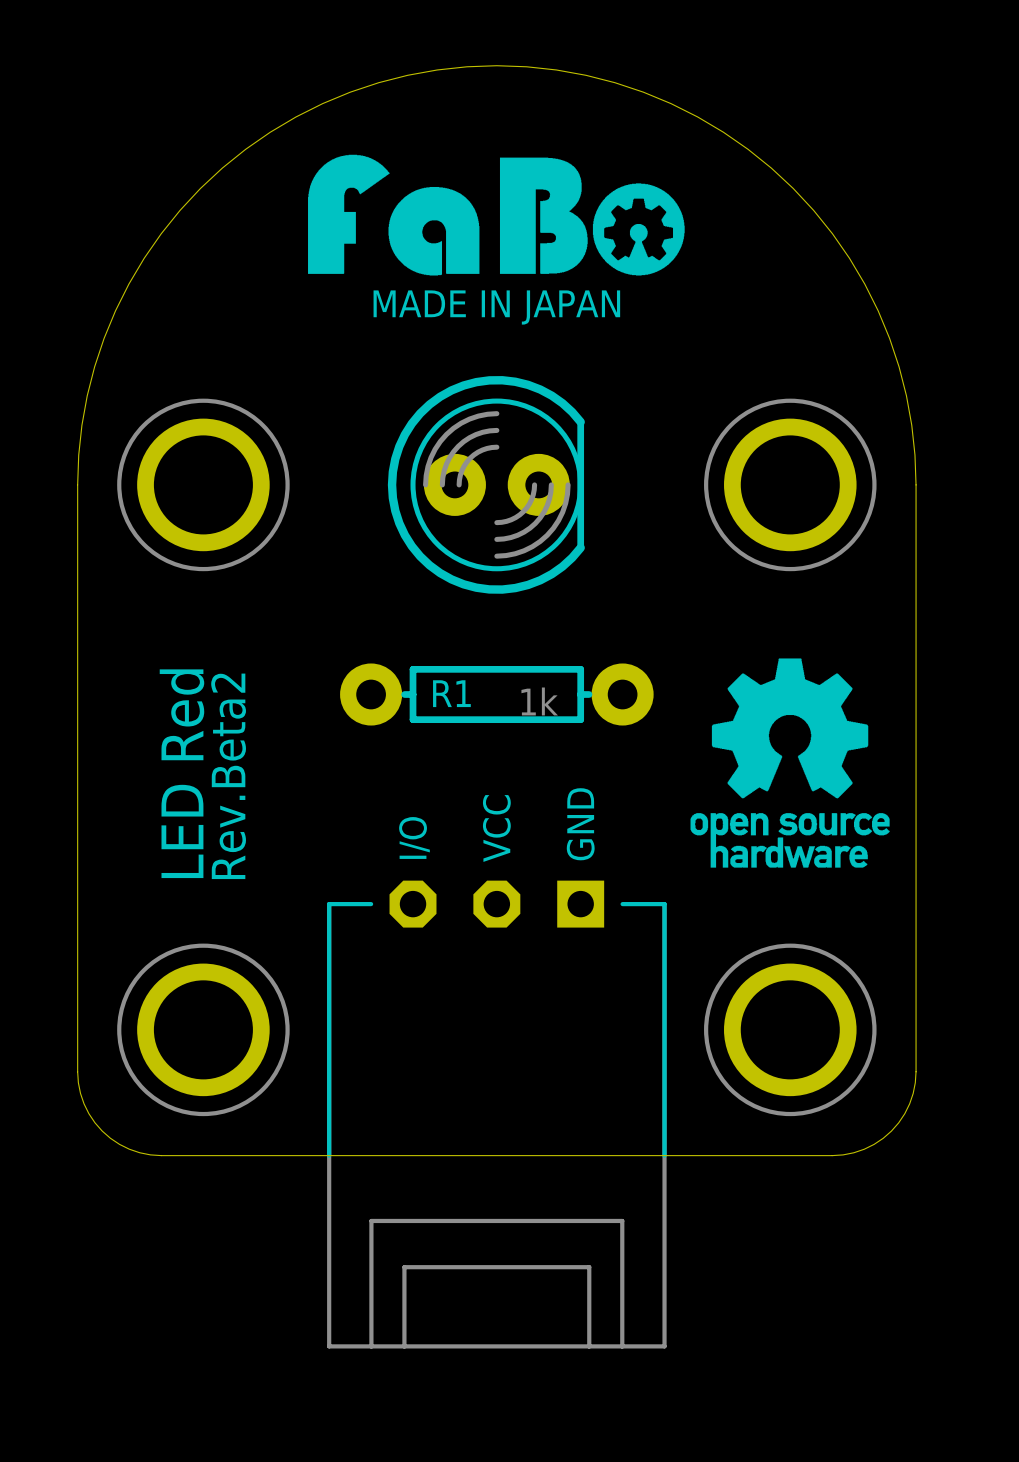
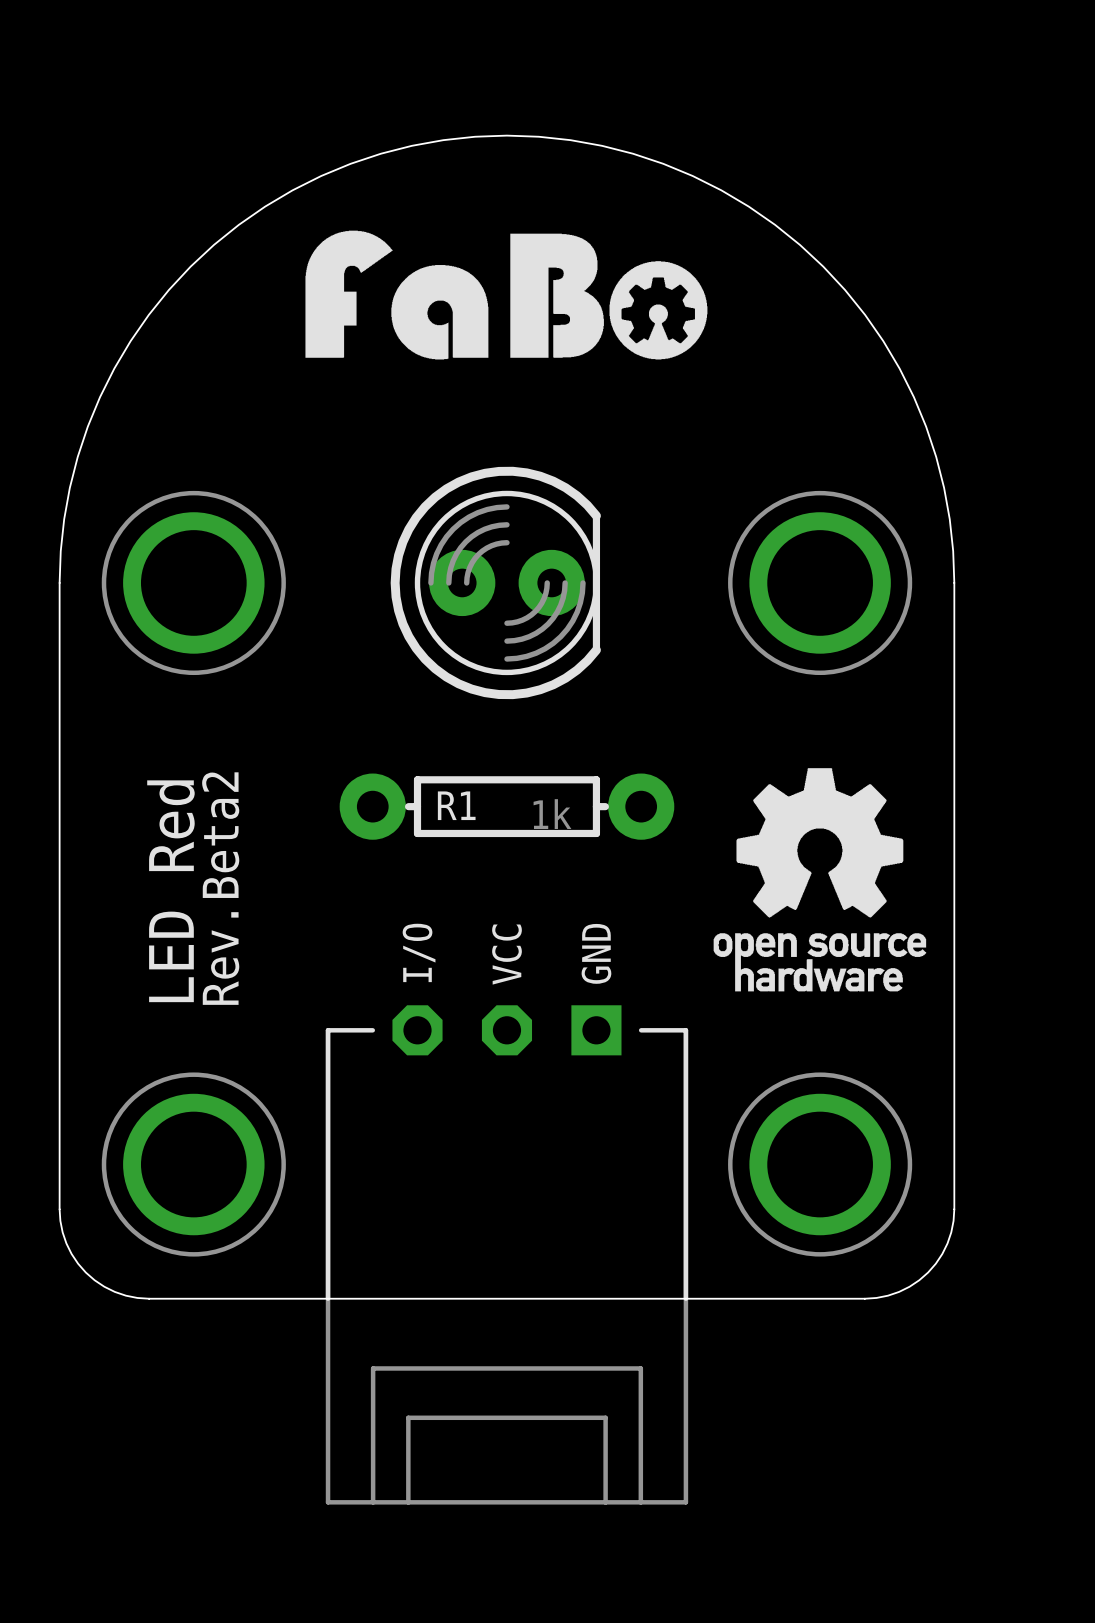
text: MADE IN JAPAN (496, 307) -> none

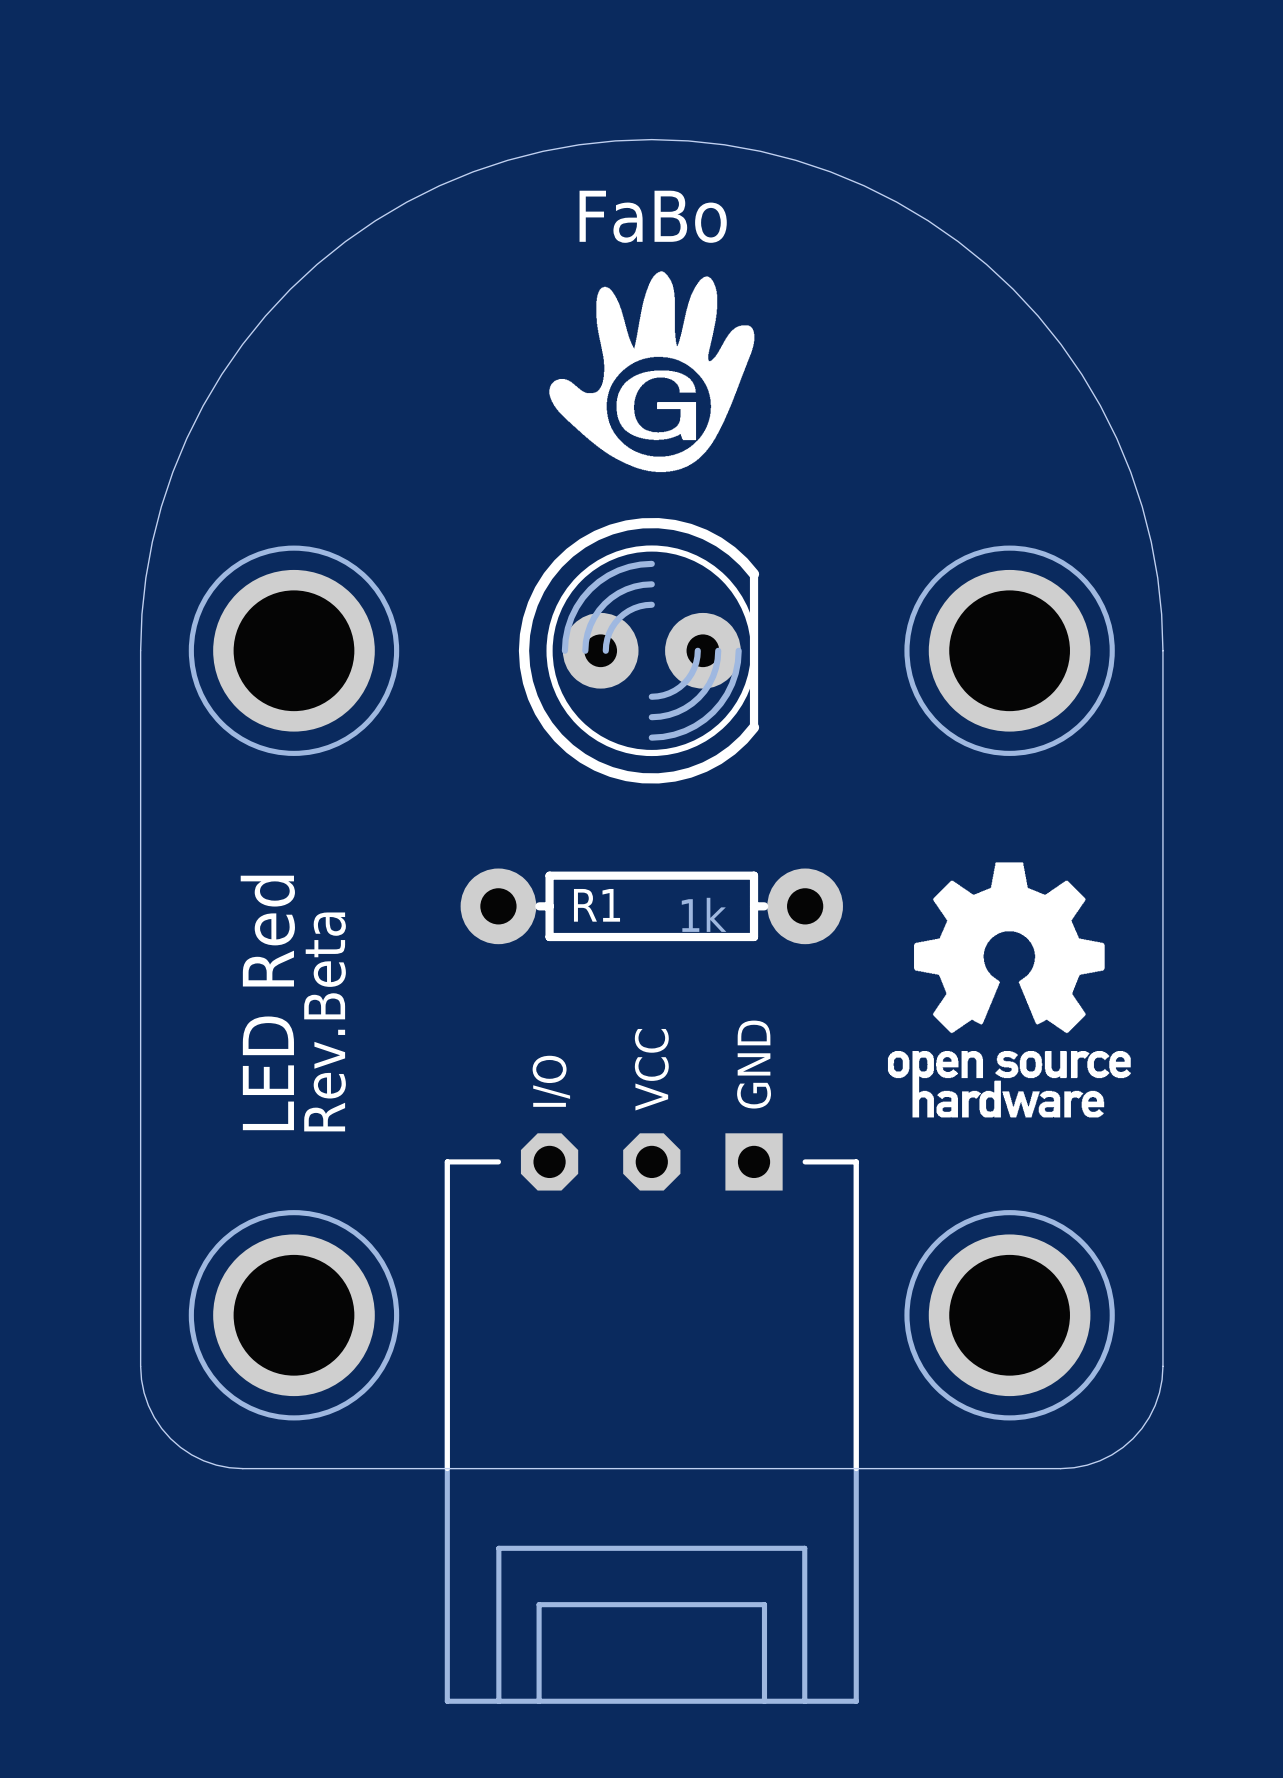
drawing: [305, 230, 708, 360] -> none
drawing: none -> [549, 271, 755, 473]
text: Rev.Beta2 (220, 888) -> Rev.Beta (325, 1021)

